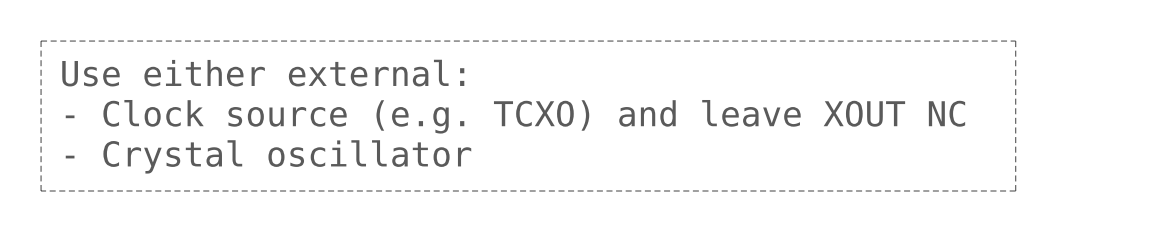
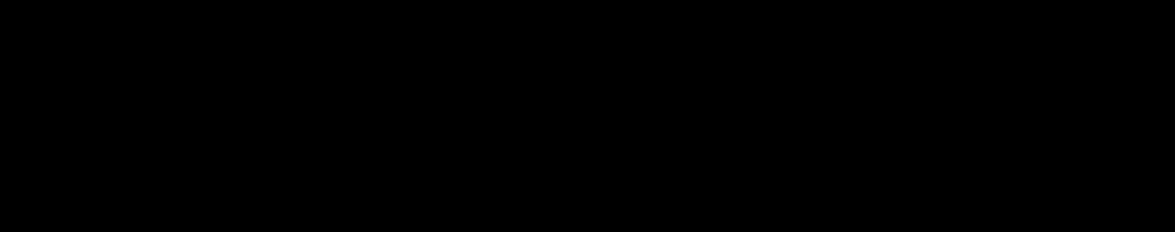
line: (41, 41) (1015, 41) (1015, 191) (41, 191) (41, 41) -> none
text: Use either external: (263, 73) -> none
text: - Clock source (e.g. TCXO) and leave XOUT NC (515, 116) -> none
text: - Crystal oscillator (268, 156) -> none

